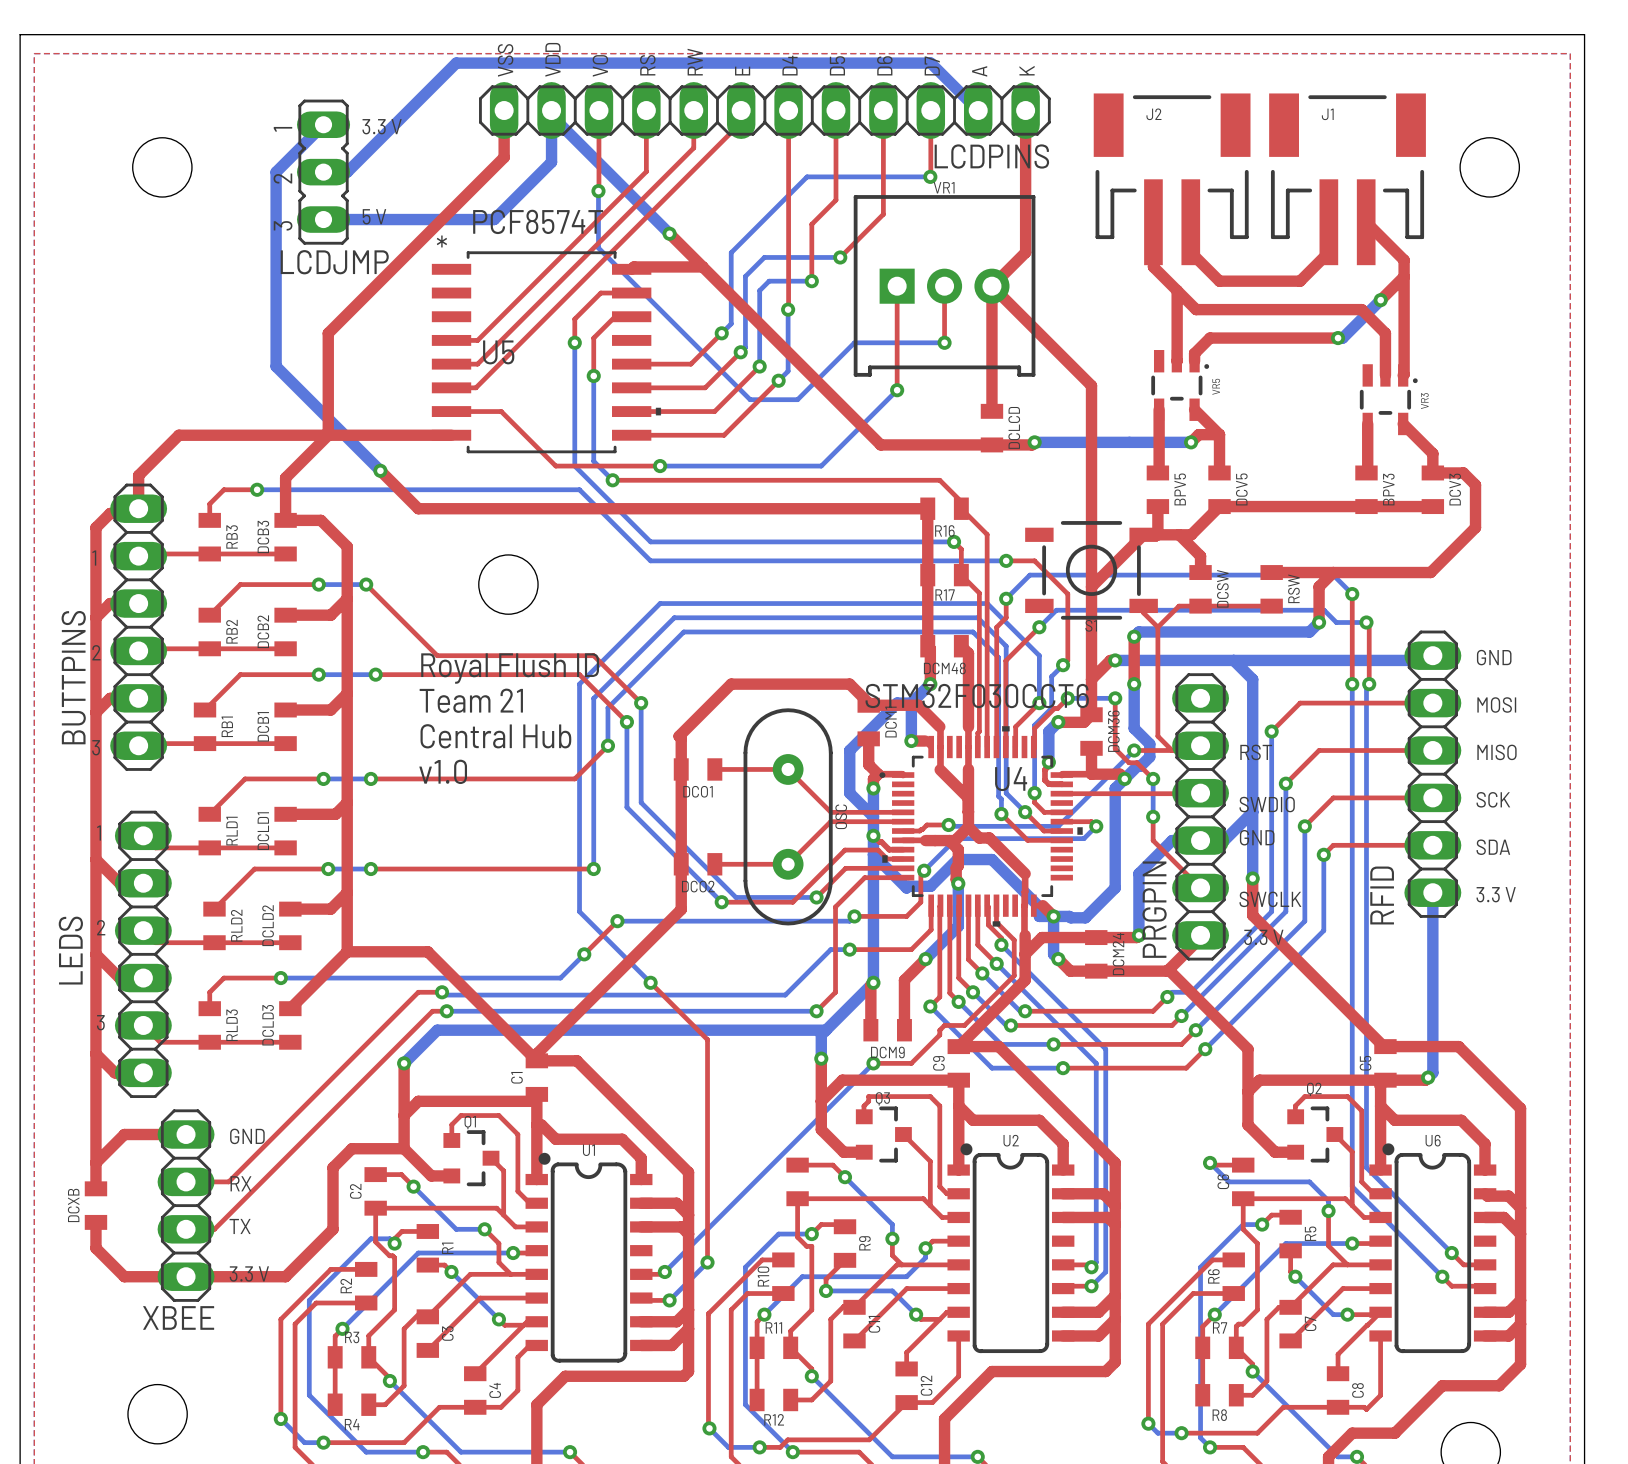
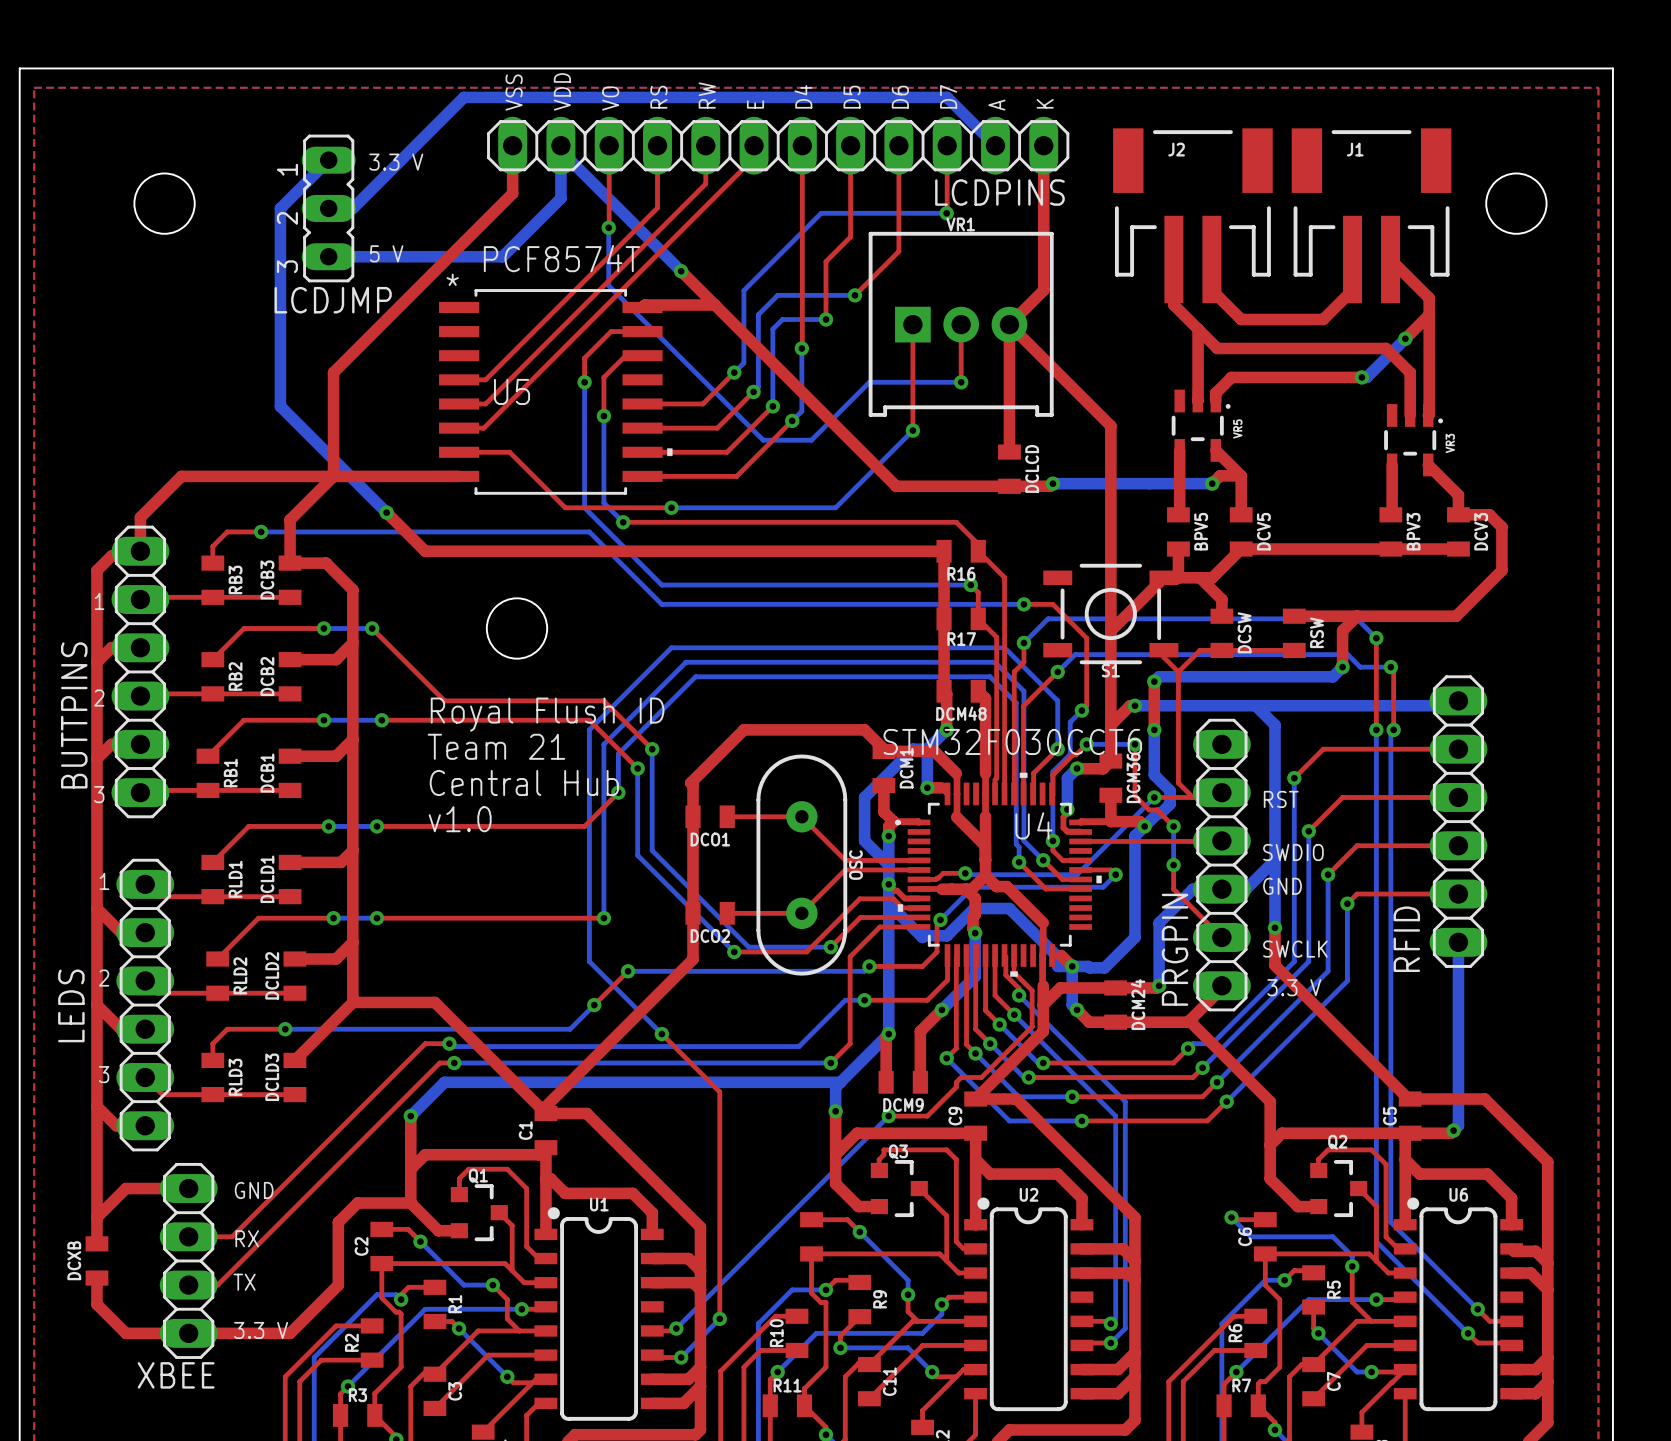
text: GND (1494, 657) -> none
text: MOSI (1496, 704) -> none
text: MISO (1496, 752) -> none
text: SCK (1493, 799) -> none
text: SDA (1493, 847) -> none
text: 3.3 V (1496, 894) -> none

